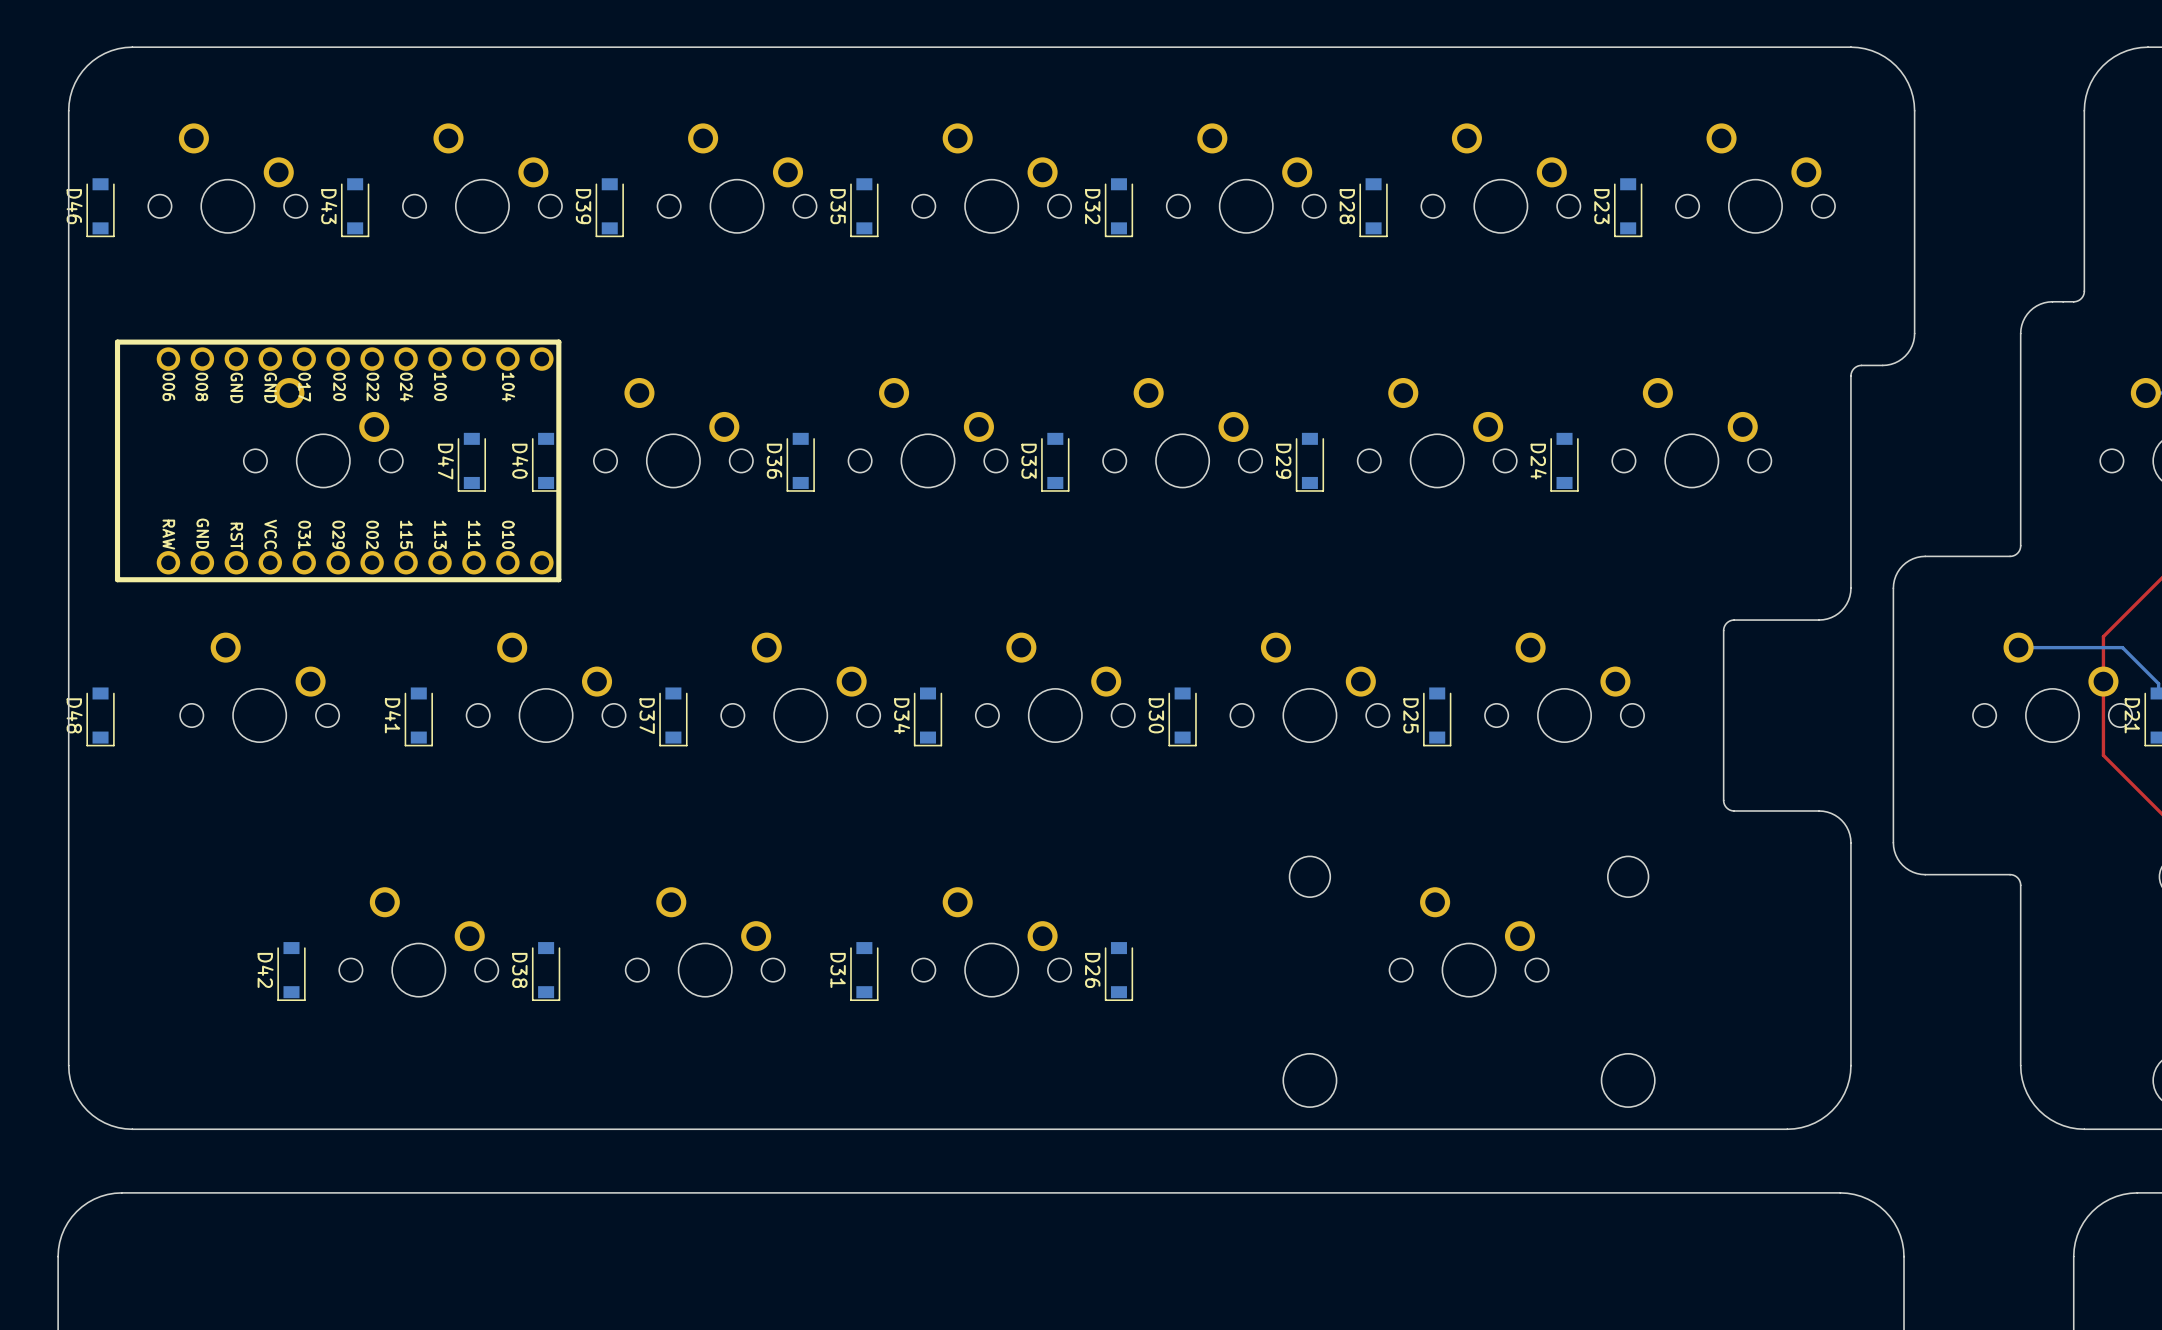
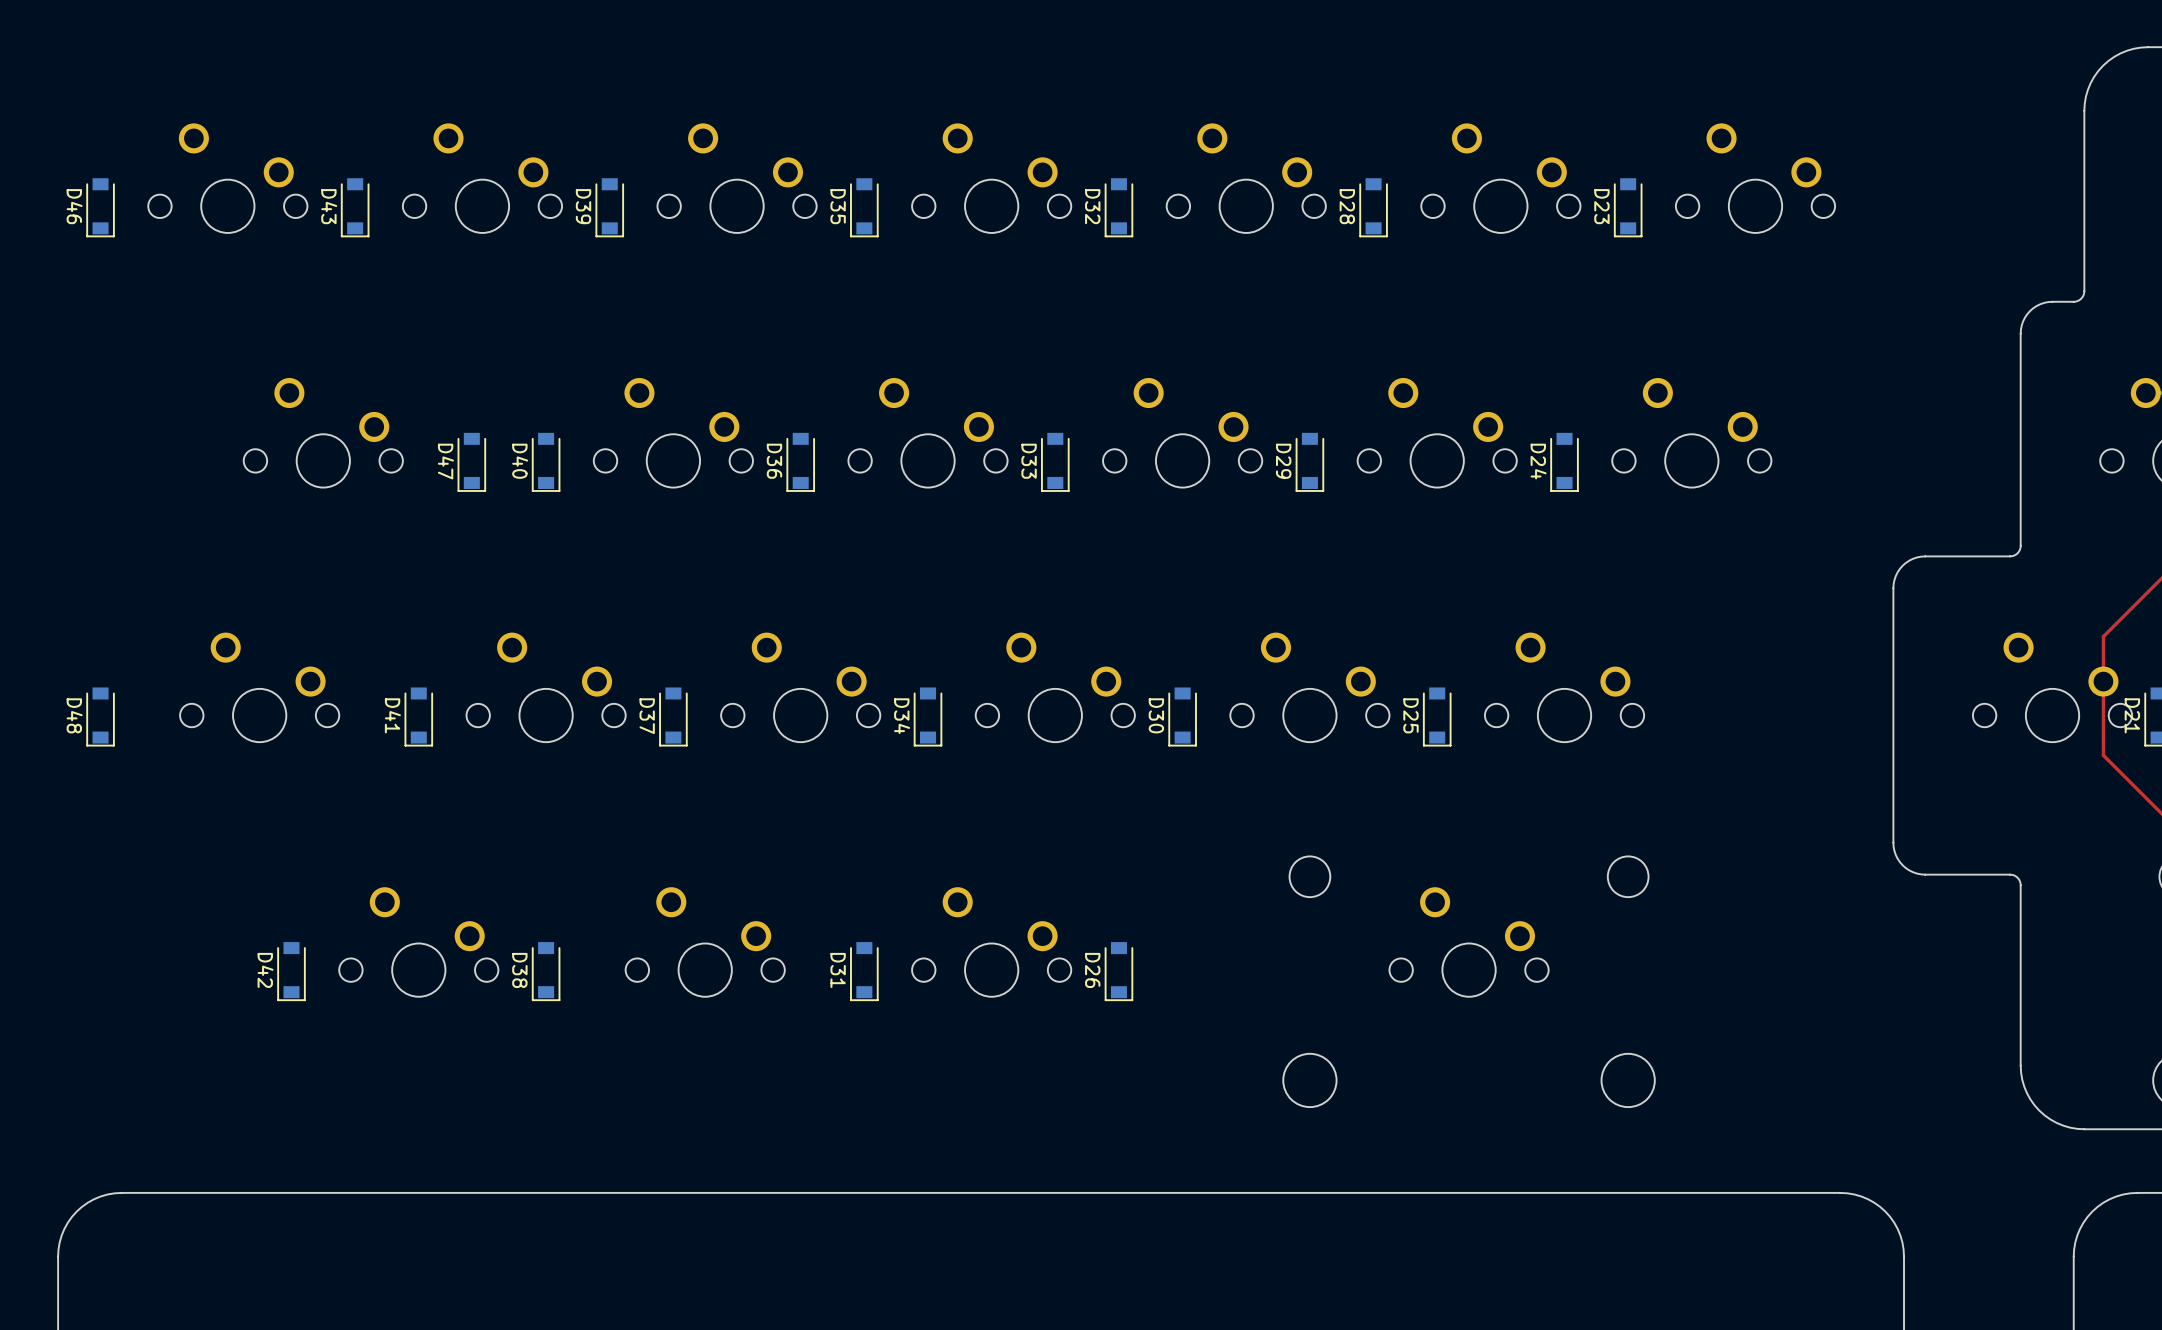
board edge: (1850, 47) (132, 47) (111, 50) (98, 56) (87, 65) (75, 83) (70, 96) (68, 110) (68, 1065) (72, 1086) (78, 1099) (92, 1115) (104, 1122) (118, 1127) (132, 1129) (1787, 1129) (1808, 1125) (1821, 1119) (1832, 1110) (1841, 1099) (1847, 1086) (1850, 1072) (1849, 834) (1841, 820) (1827, 812) (1734, 810) (1725, 805) (1723, 630) (1726, 623) (1732, 620) (1827, 618) (1838, 613) (1846, 604) (1850, 588) (1851, 373) (1858, 365) (1886, 365) (1898, 361) (1908, 352) (1913, 341) (1914, 110) (1913, 96) (1904, 76) (1890, 61) (1871, 50) (1850, 47) -> none
part: (338, 460) -> none
bottom track: (2018, 647) (2122, 647) (2158, 683) (2158, 693) -> none

